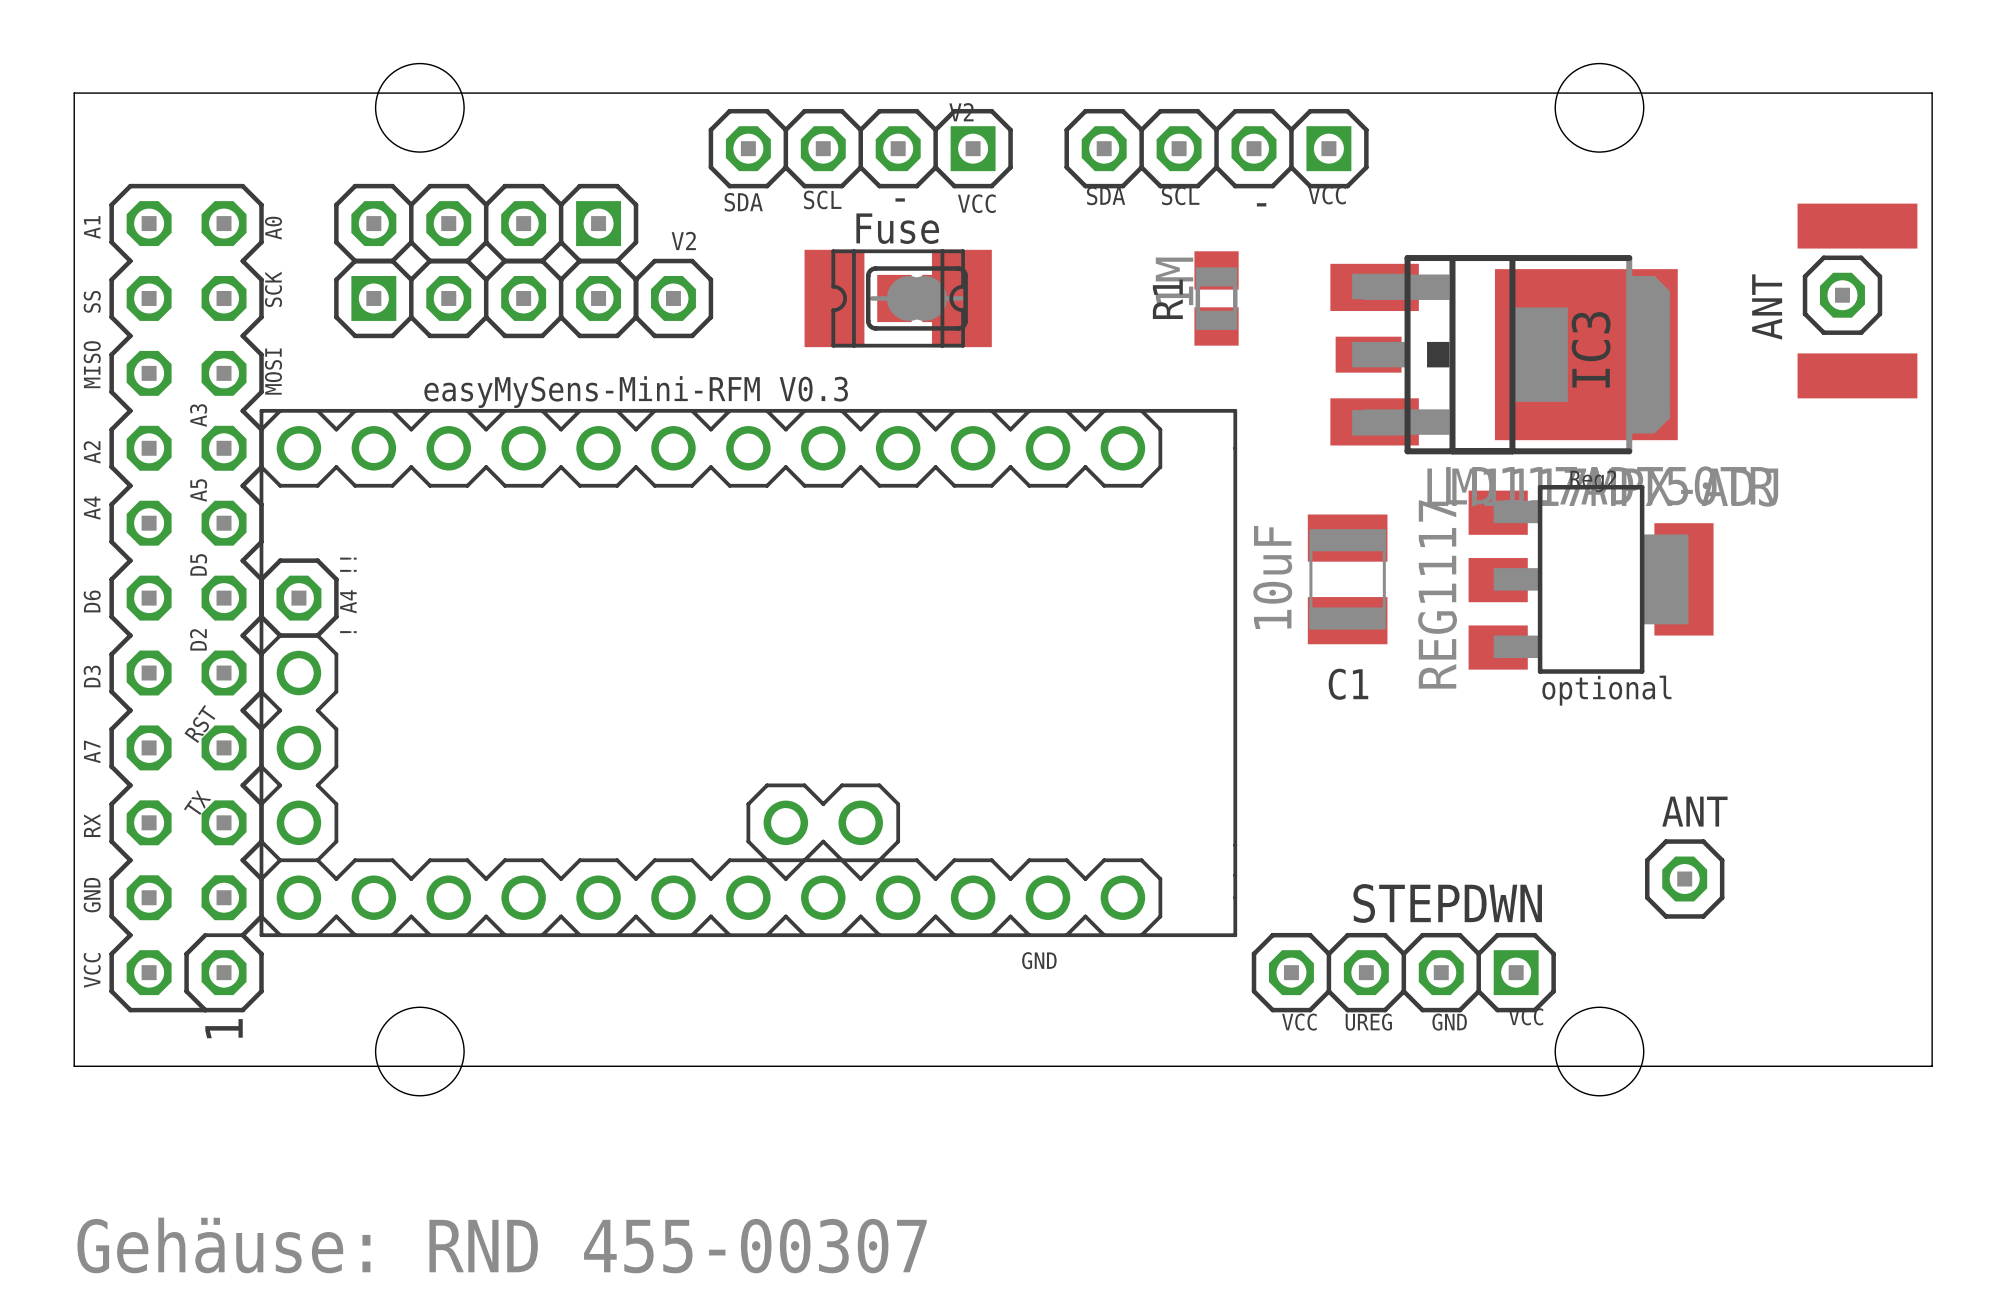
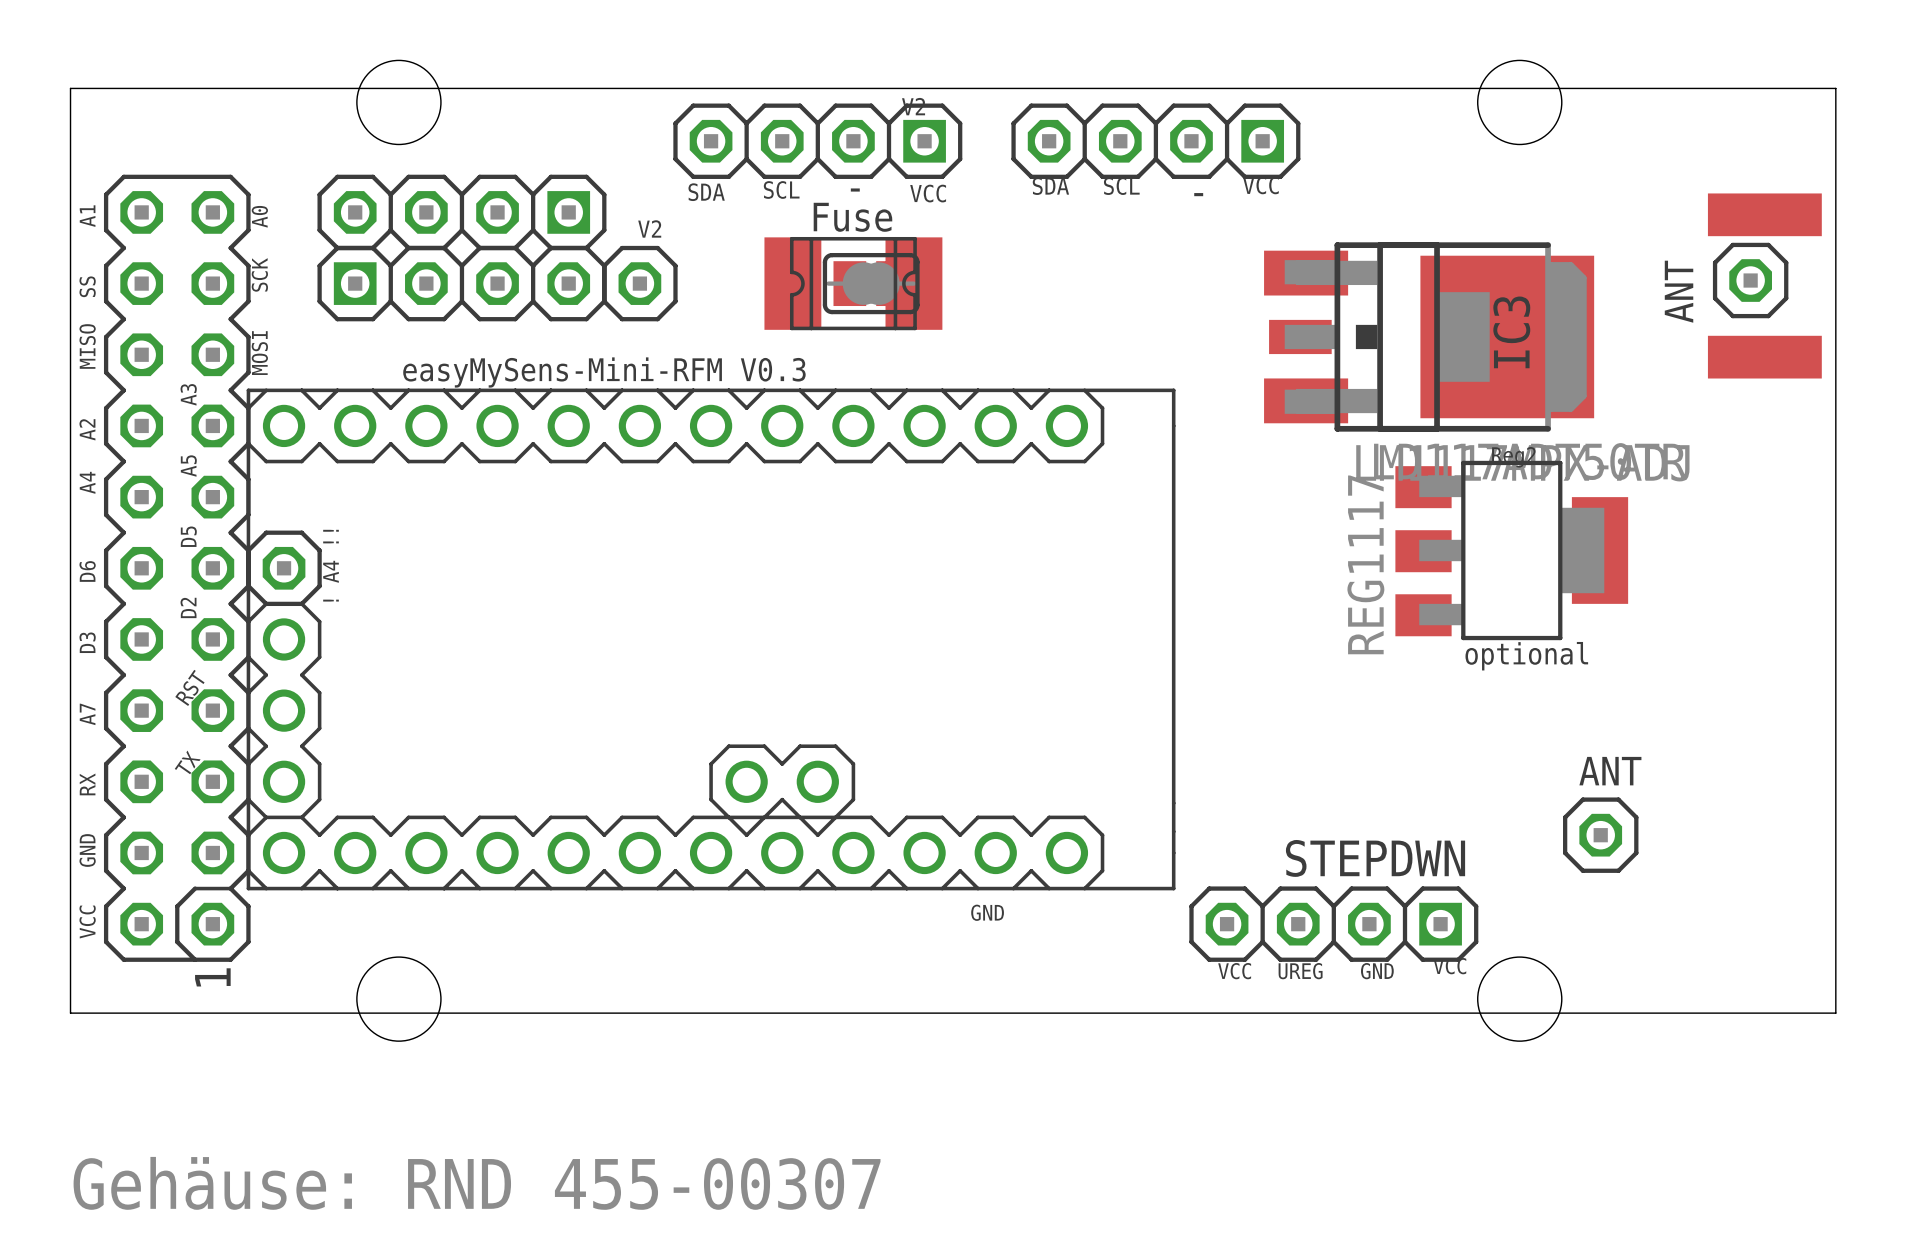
part: 1M (1216, 298) -> none
text: R1 (1167, 299) -> none
part: 10uF (1347, 579) -> none
text: C1 (1348, 684) -> none

